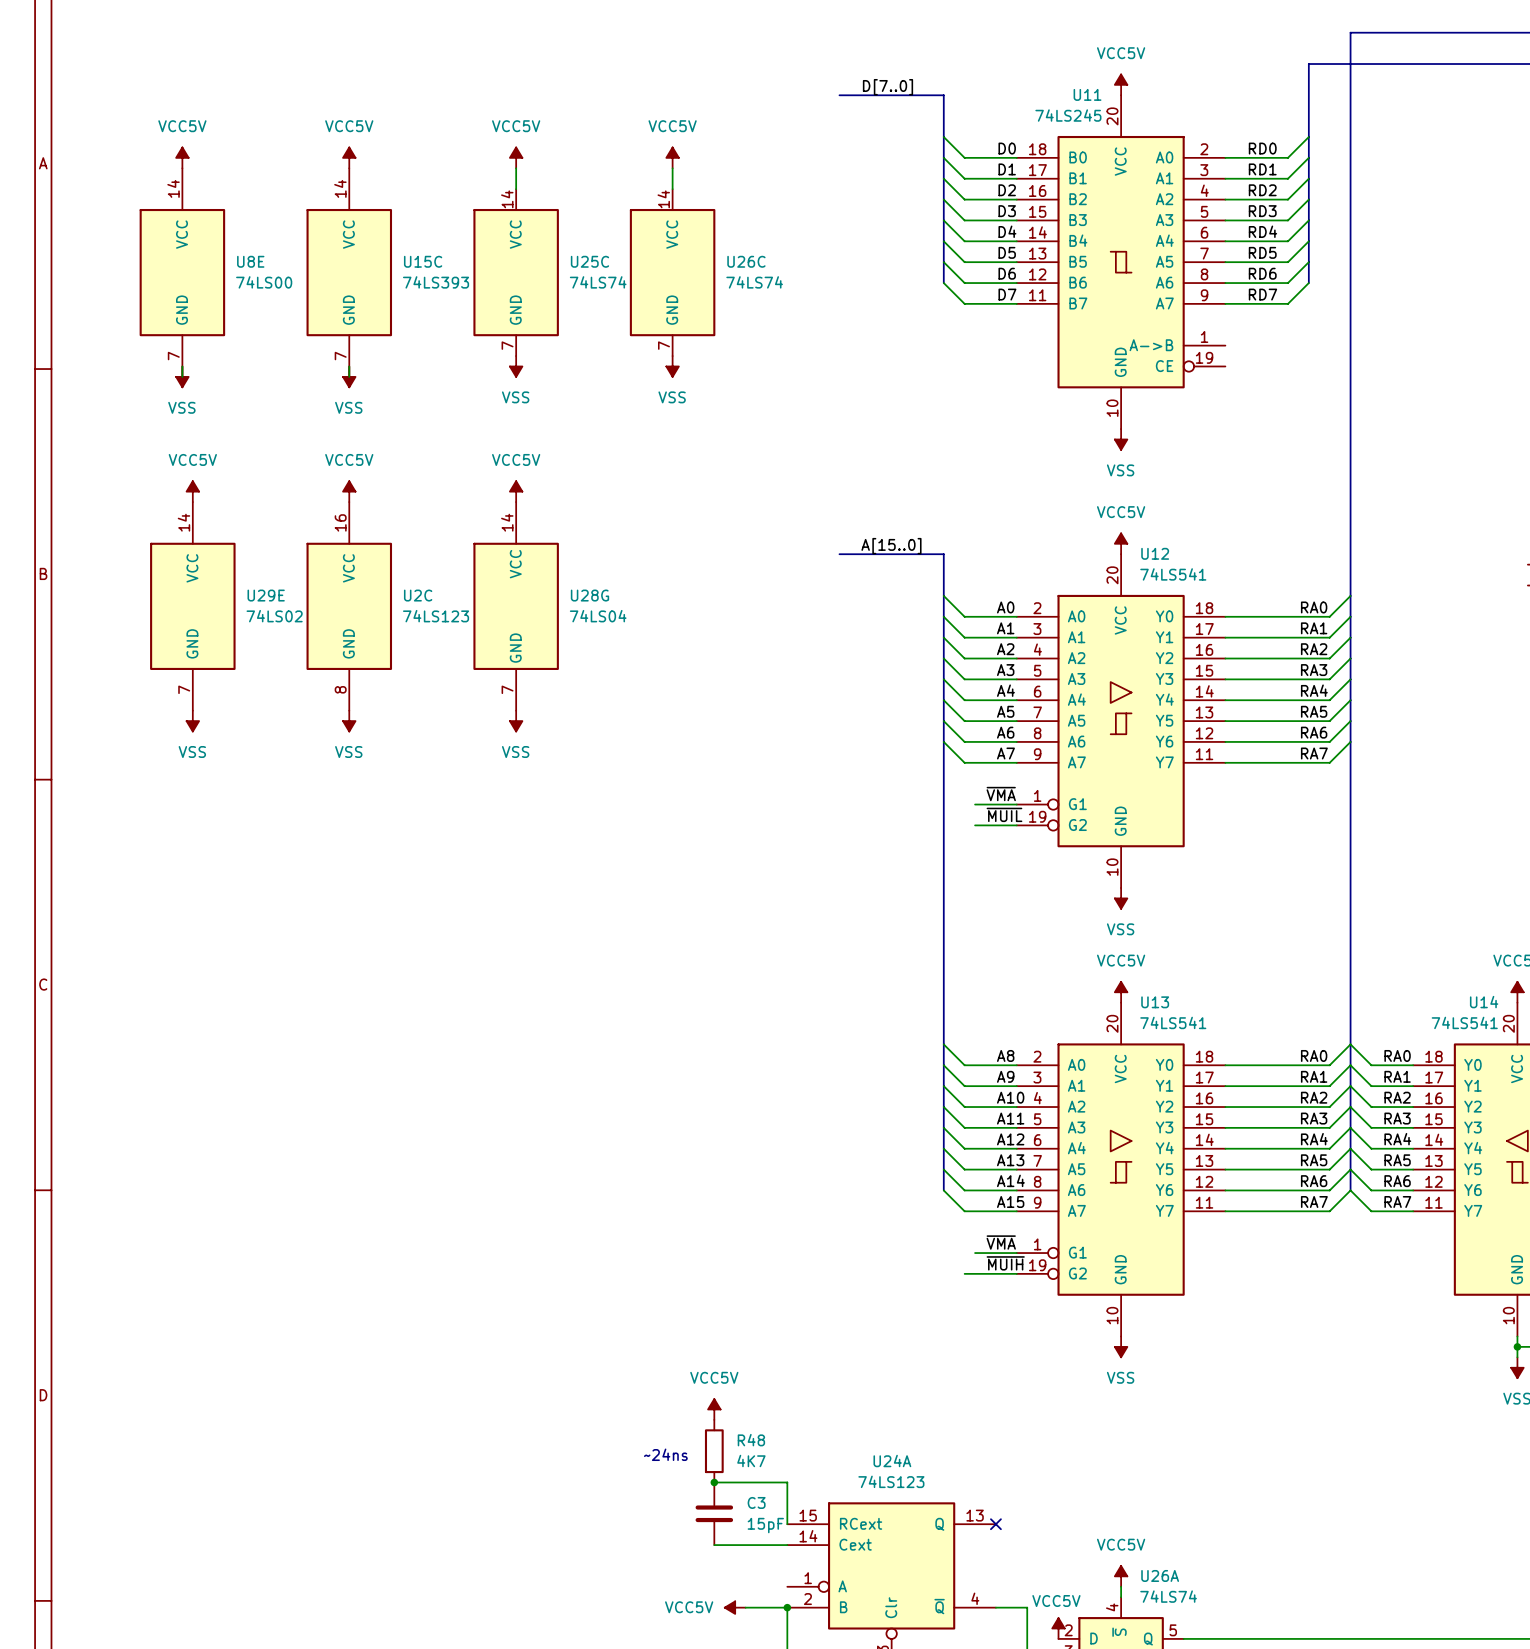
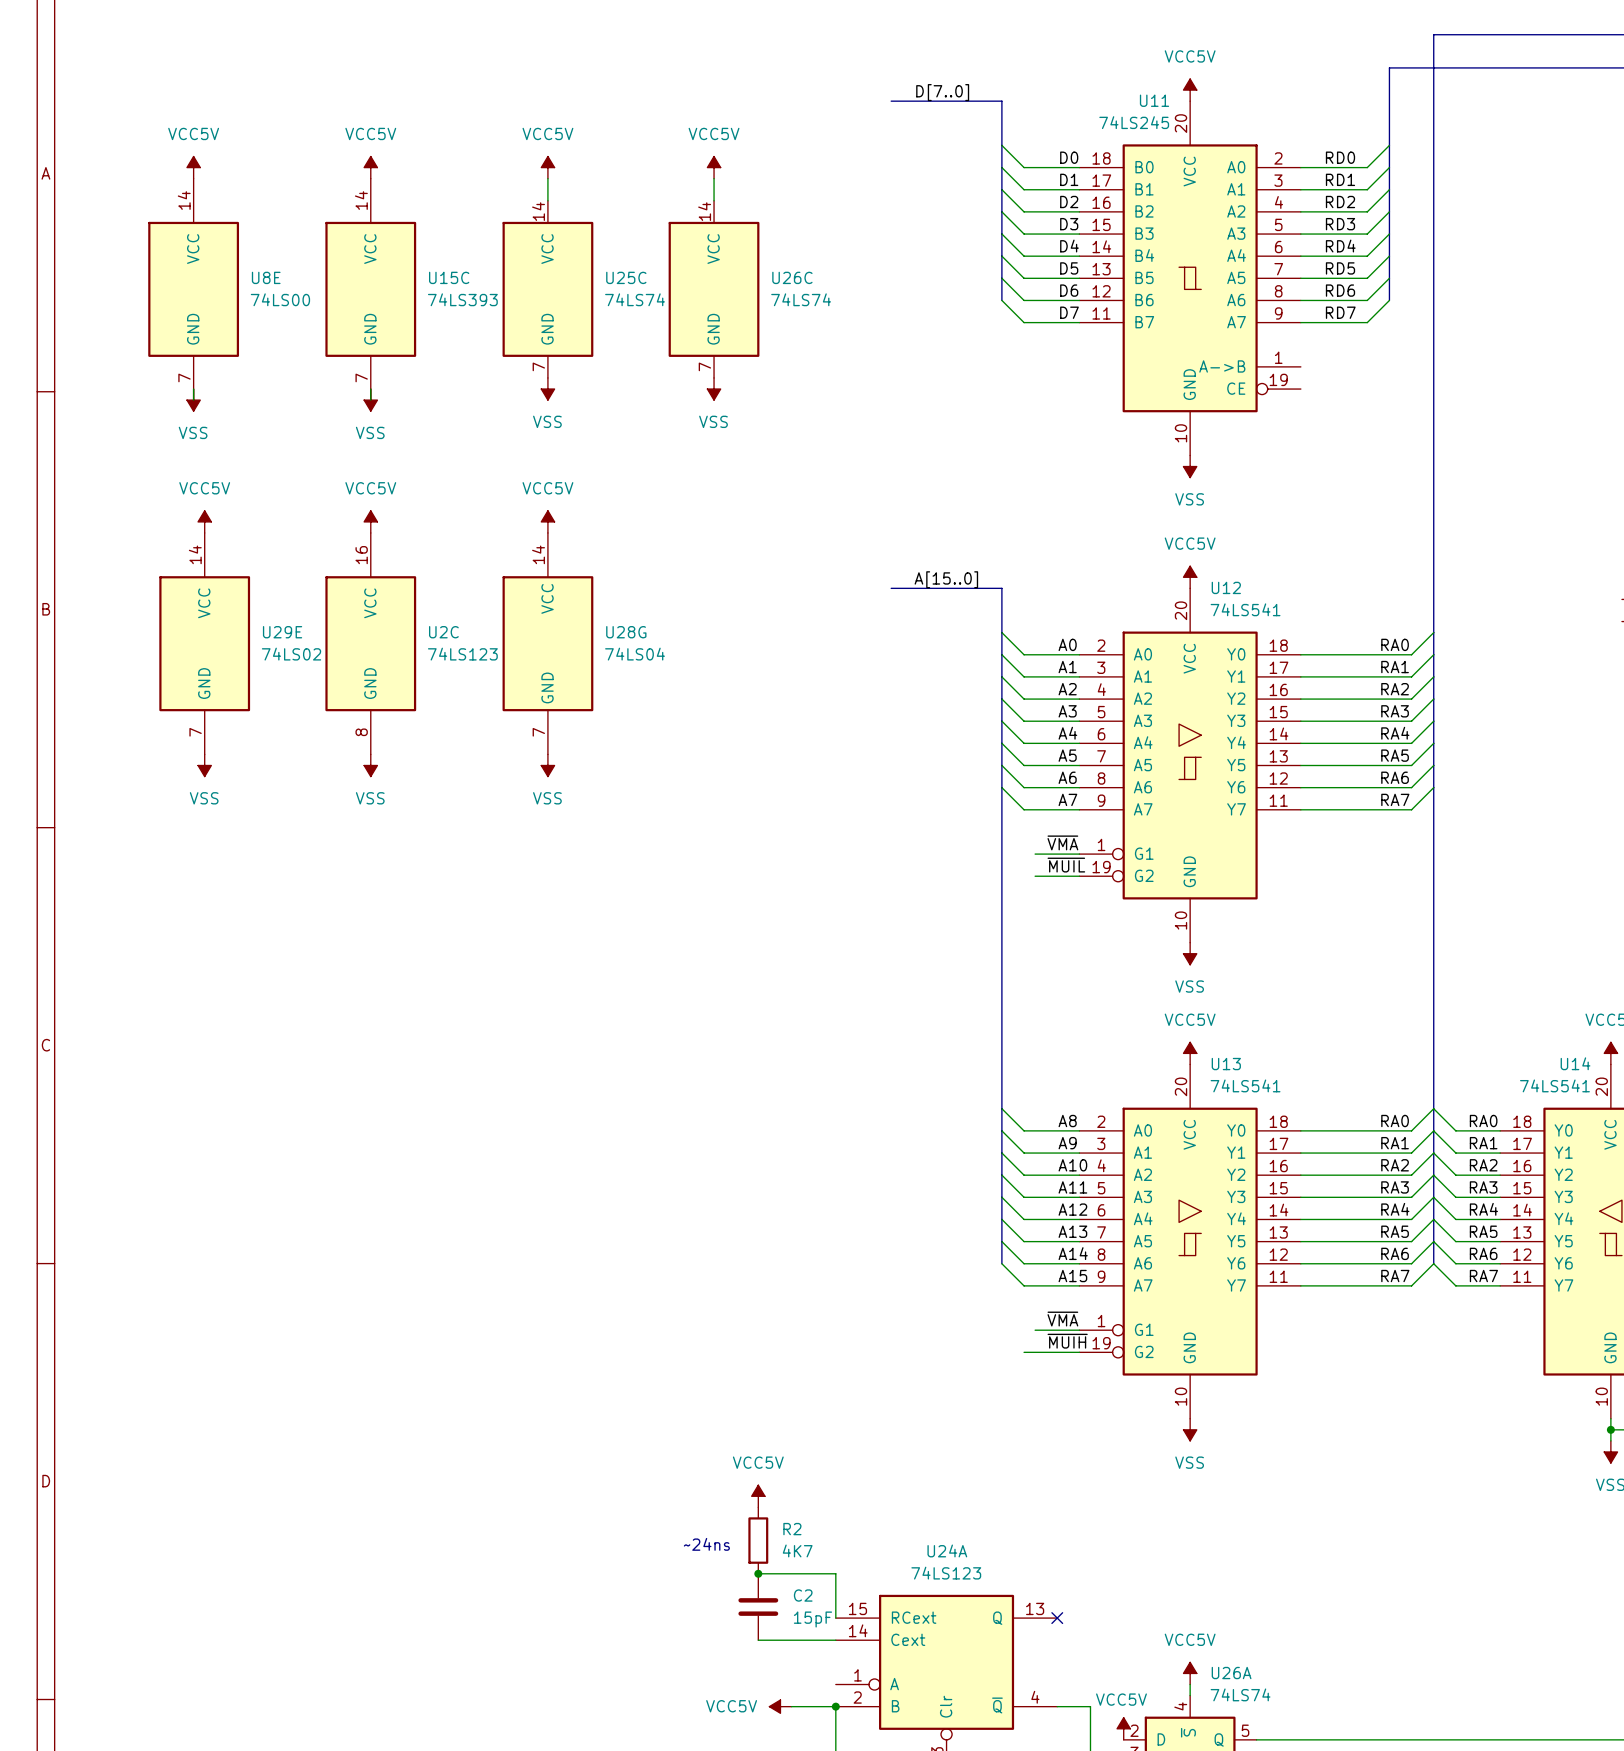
R48 name: R48 (751, 1440) -> R2 (792, 1529)
C3 name: C3 (756, 1502) -> C2 (803, 1595)

